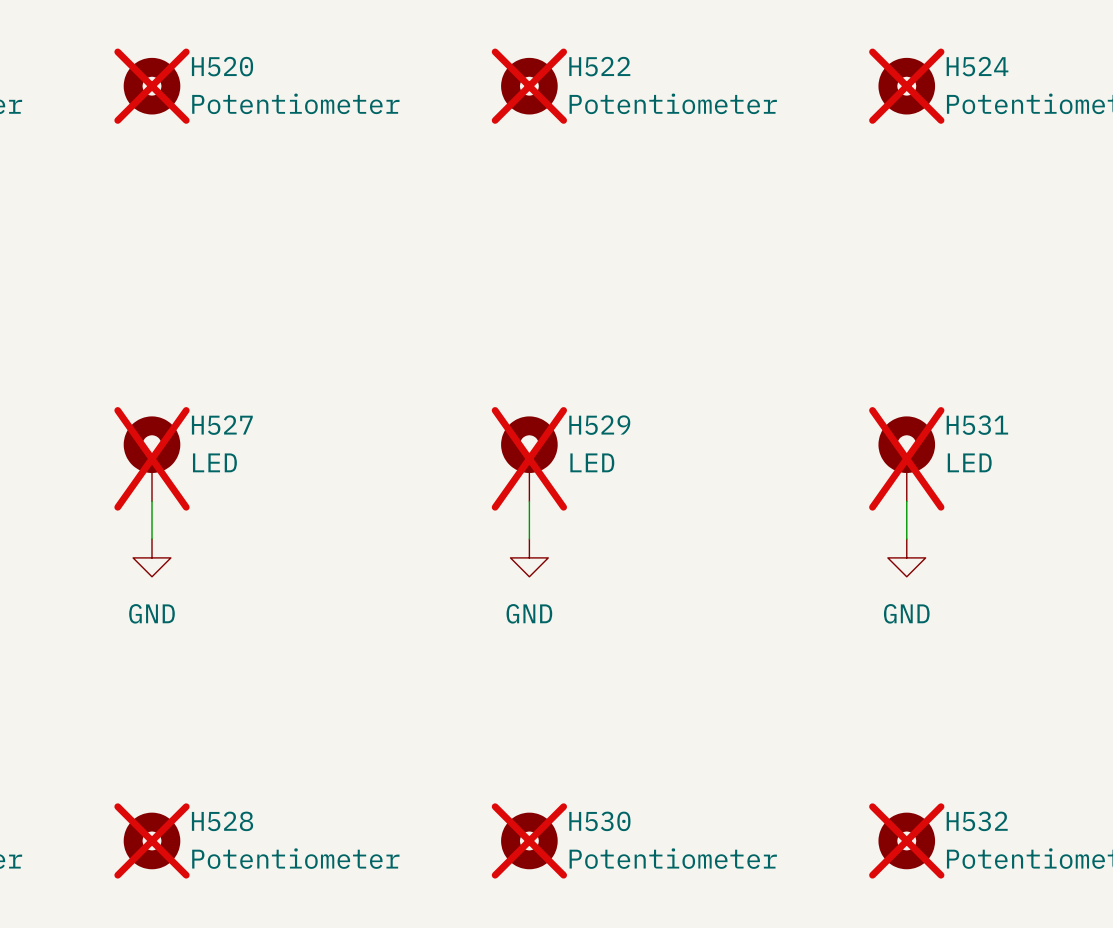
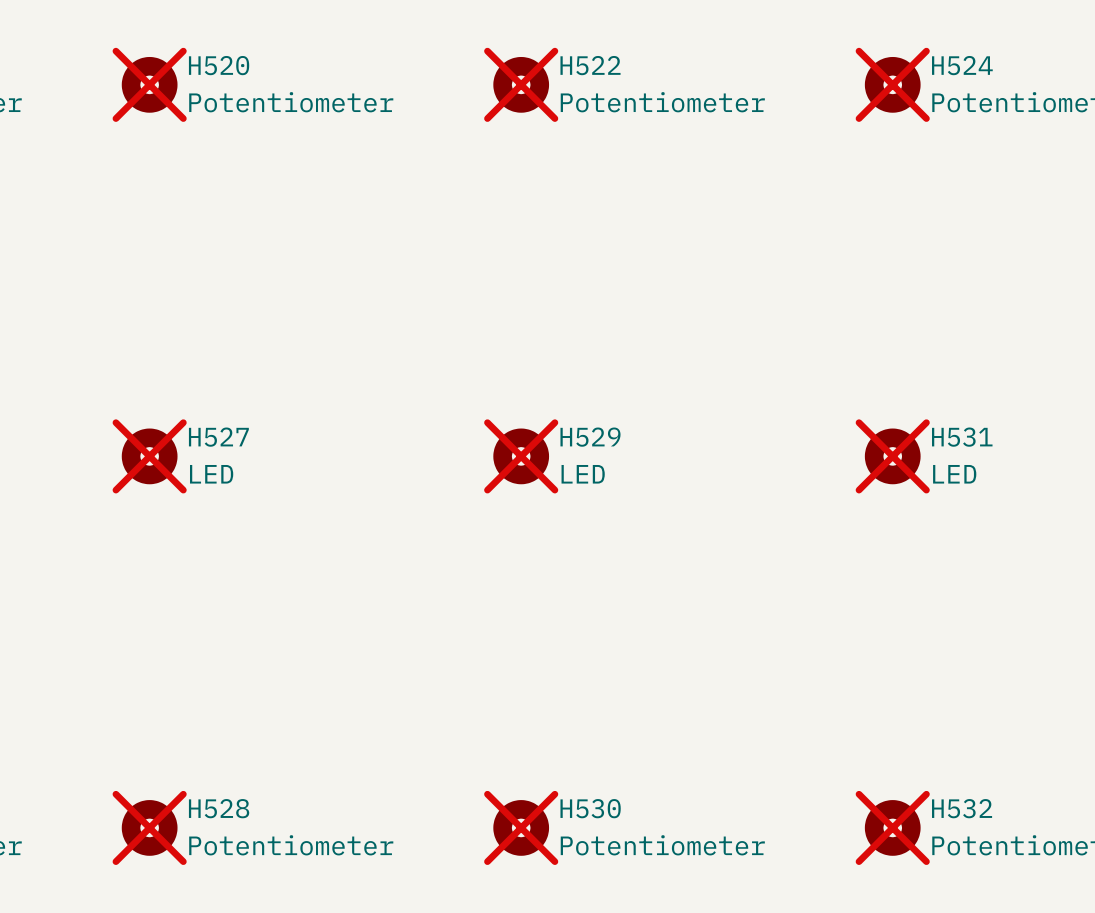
H527 symbol: [123, 416, 181, 502] -> [121, 428, 178, 485]
H529 symbol: [501, 416, 558, 502] -> [493, 428, 550, 485]
H531 symbol: [878, 416, 936, 502] -> [864, 428, 921, 485]
wire: (152, 501) (152, 539) -> none
wire: (529, 501) (529, 539) -> none
wire: (906, 501) (906, 539) -> none
power symbol: GND (152, 557) -> none
power symbol: GND (529, 557) -> none
power symbol: GND (906, 557) -> none

